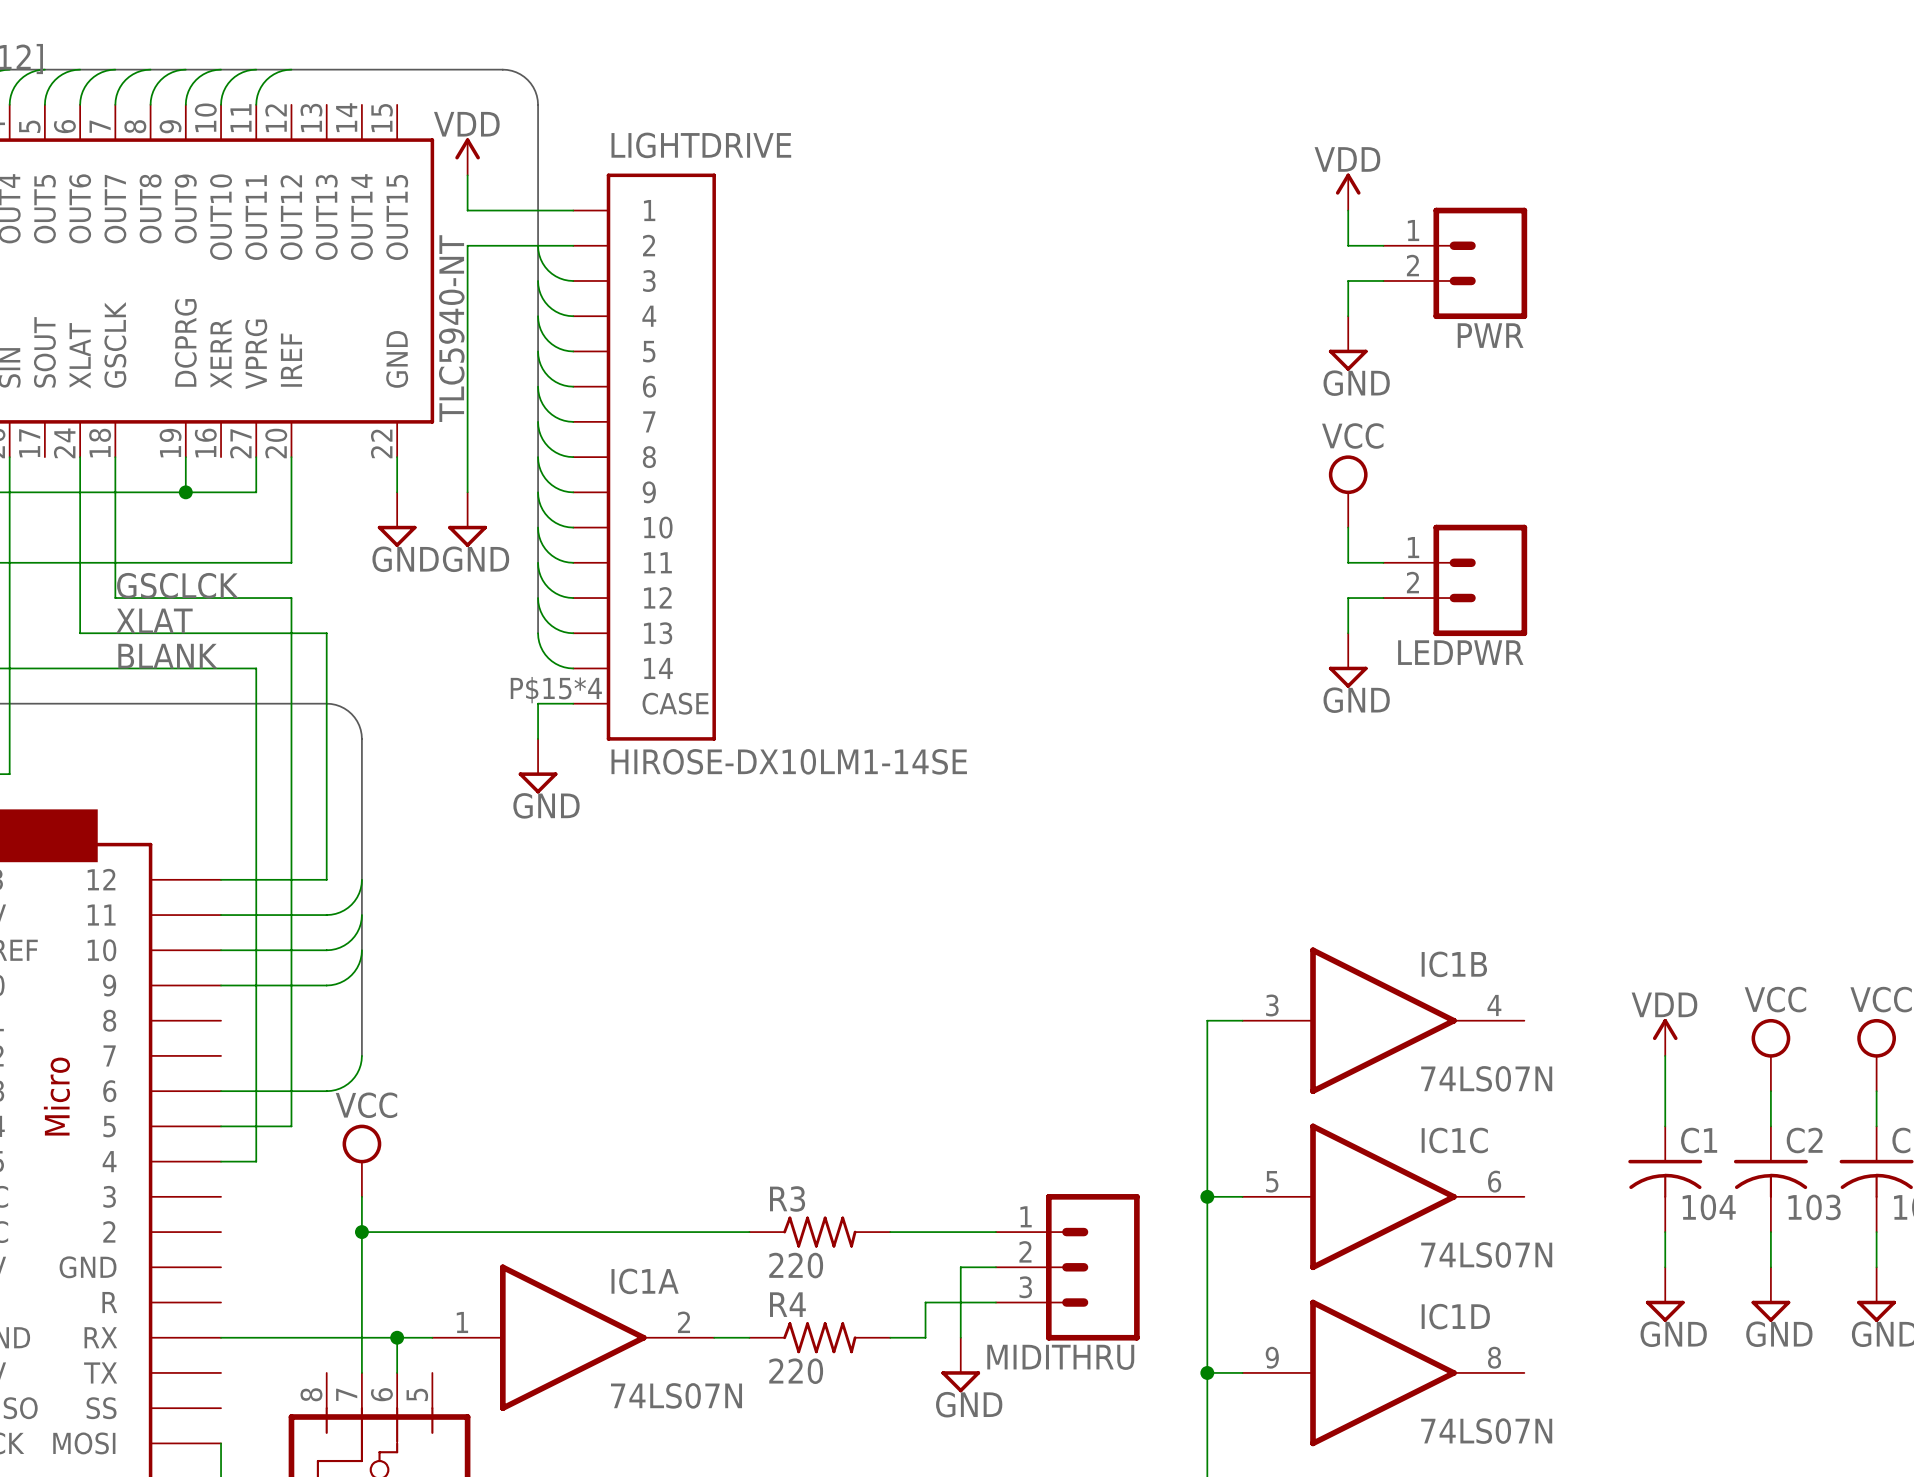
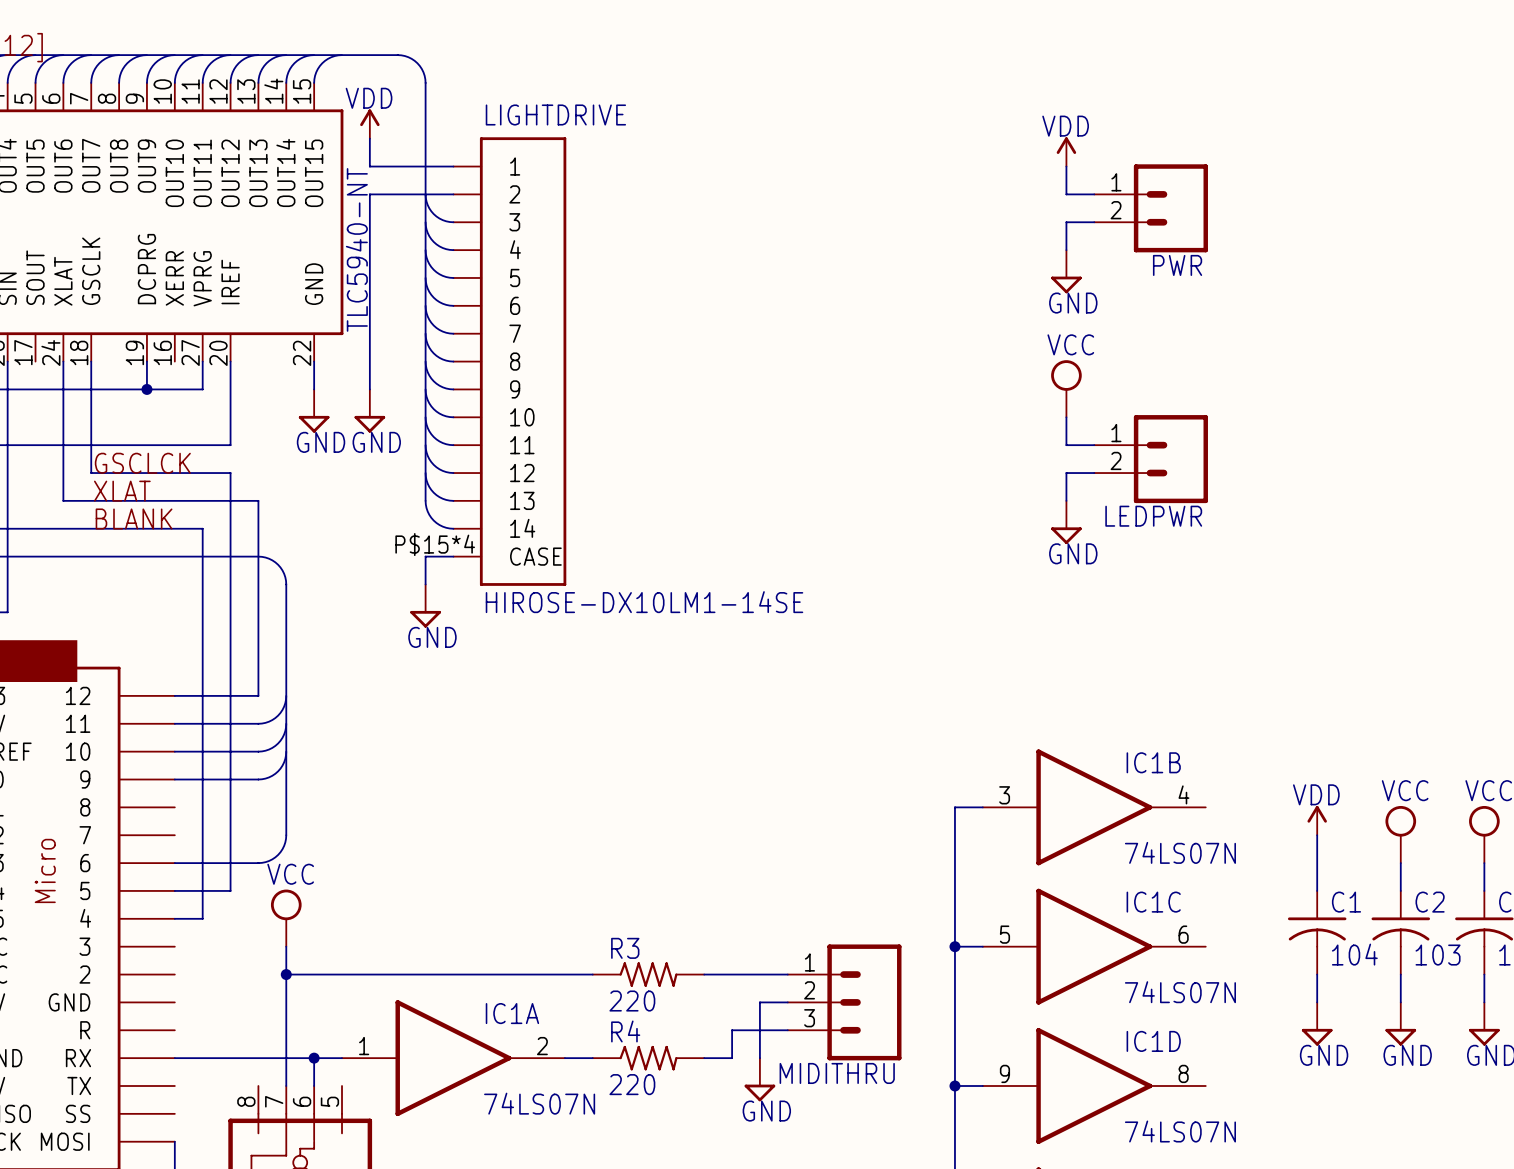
wire: none -> (258, 55) (247, 57) (238, 63) (232, 72) (230, 82)
wire: none -> (286, 55) (275, 57) (266, 63) (260, 72) (258, 82)
wire: none -> (314, 55) (303, 57) (294, 63) (288, 72) (286, 82)
wire: none -> (342, 55) (331, 57) (322, 63) (316, 72) (314, 82)

